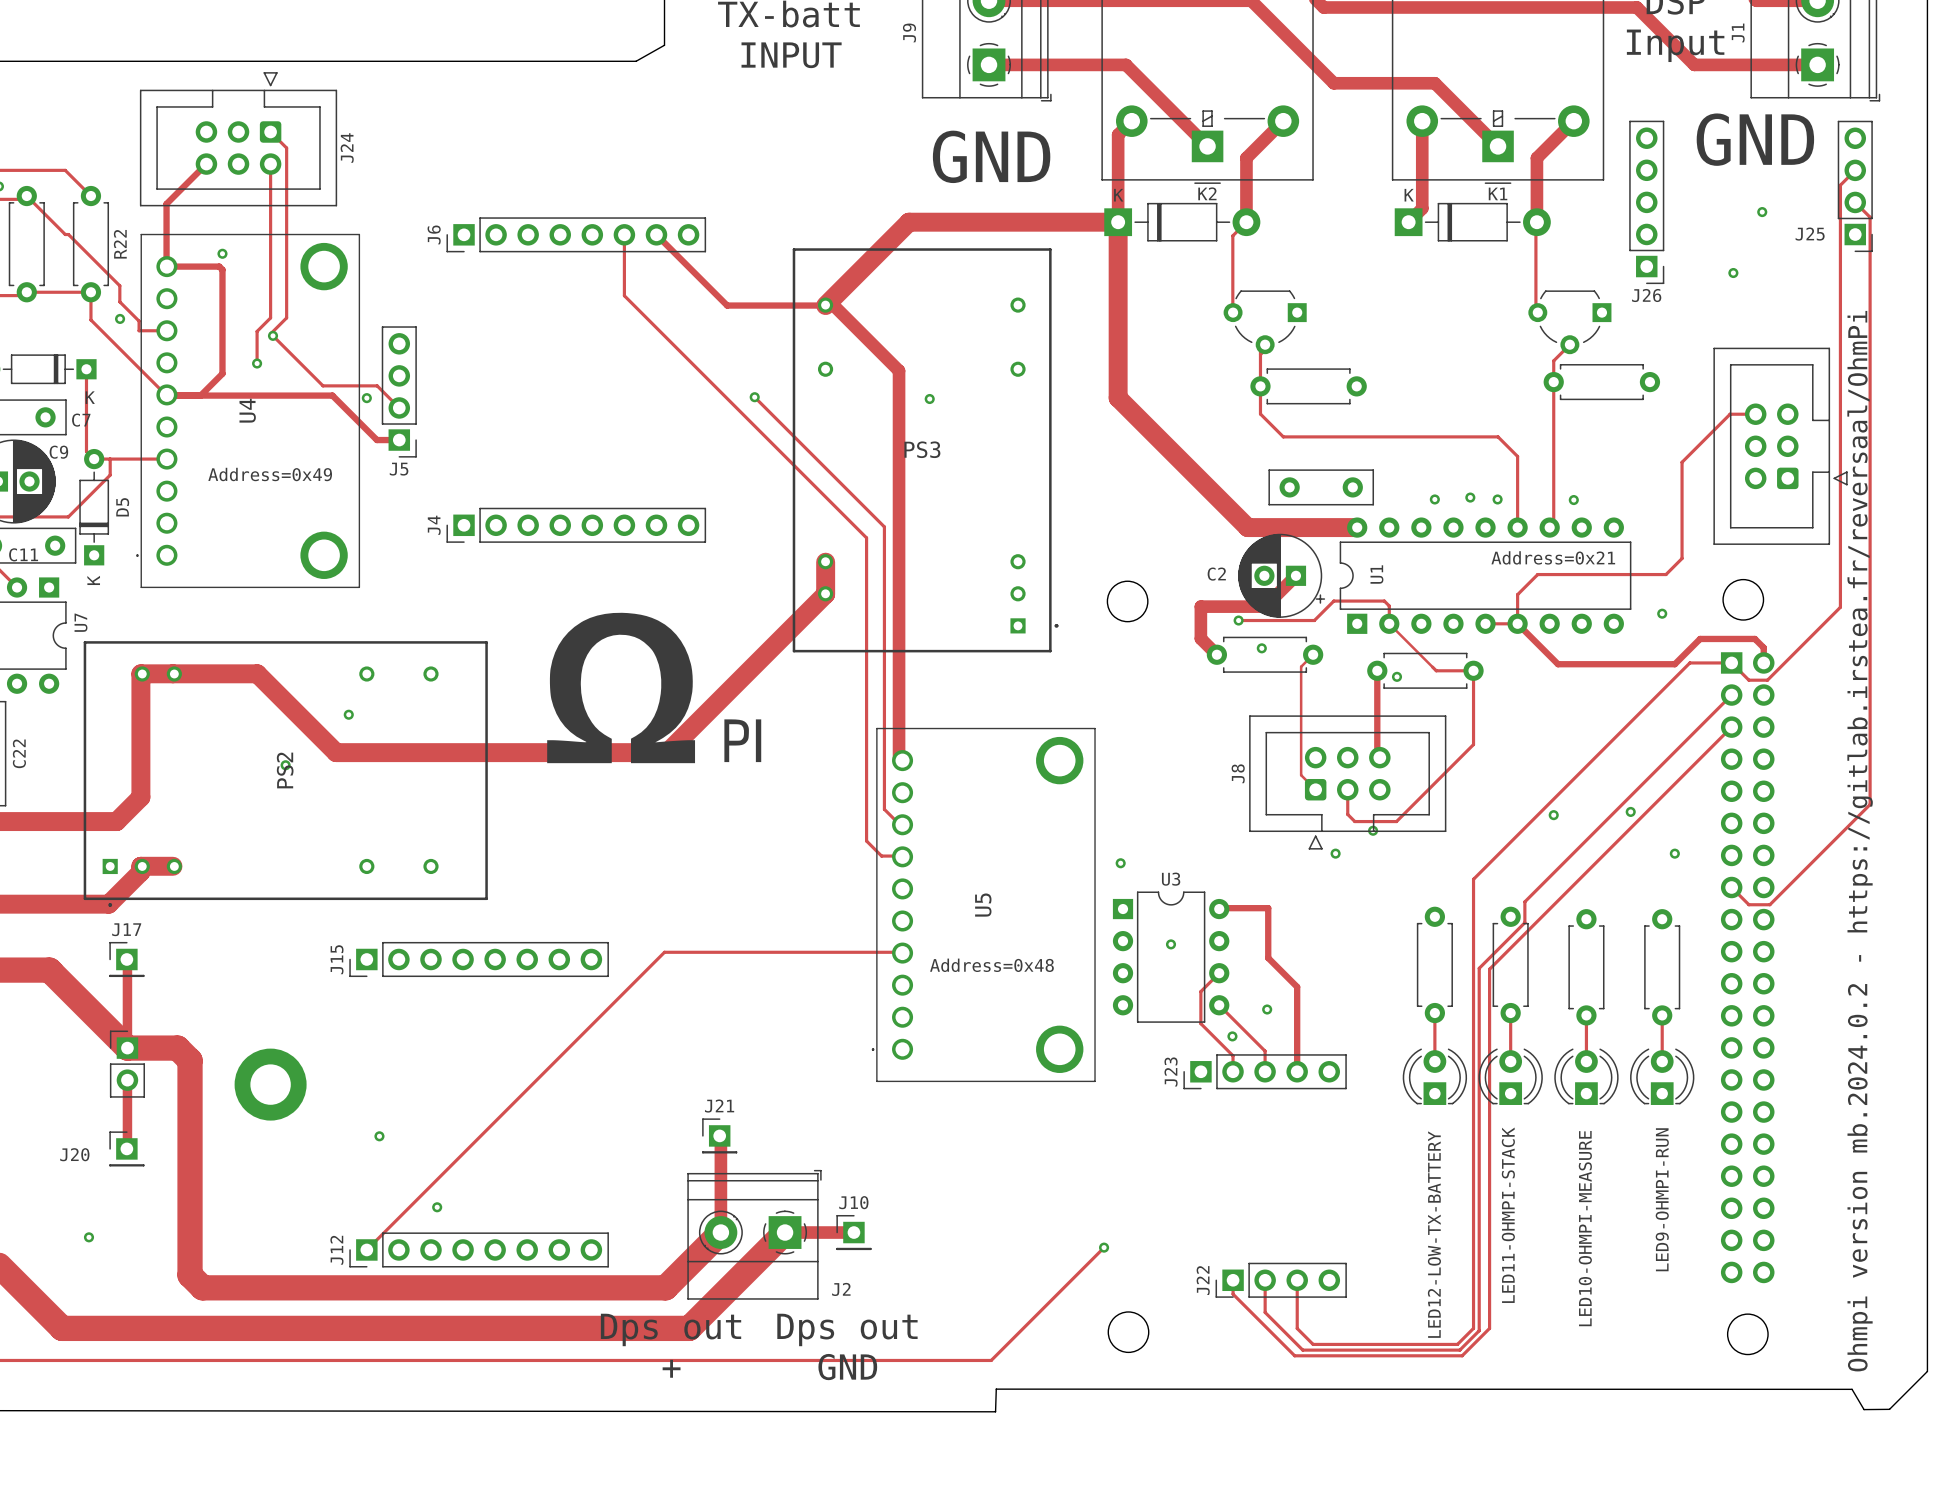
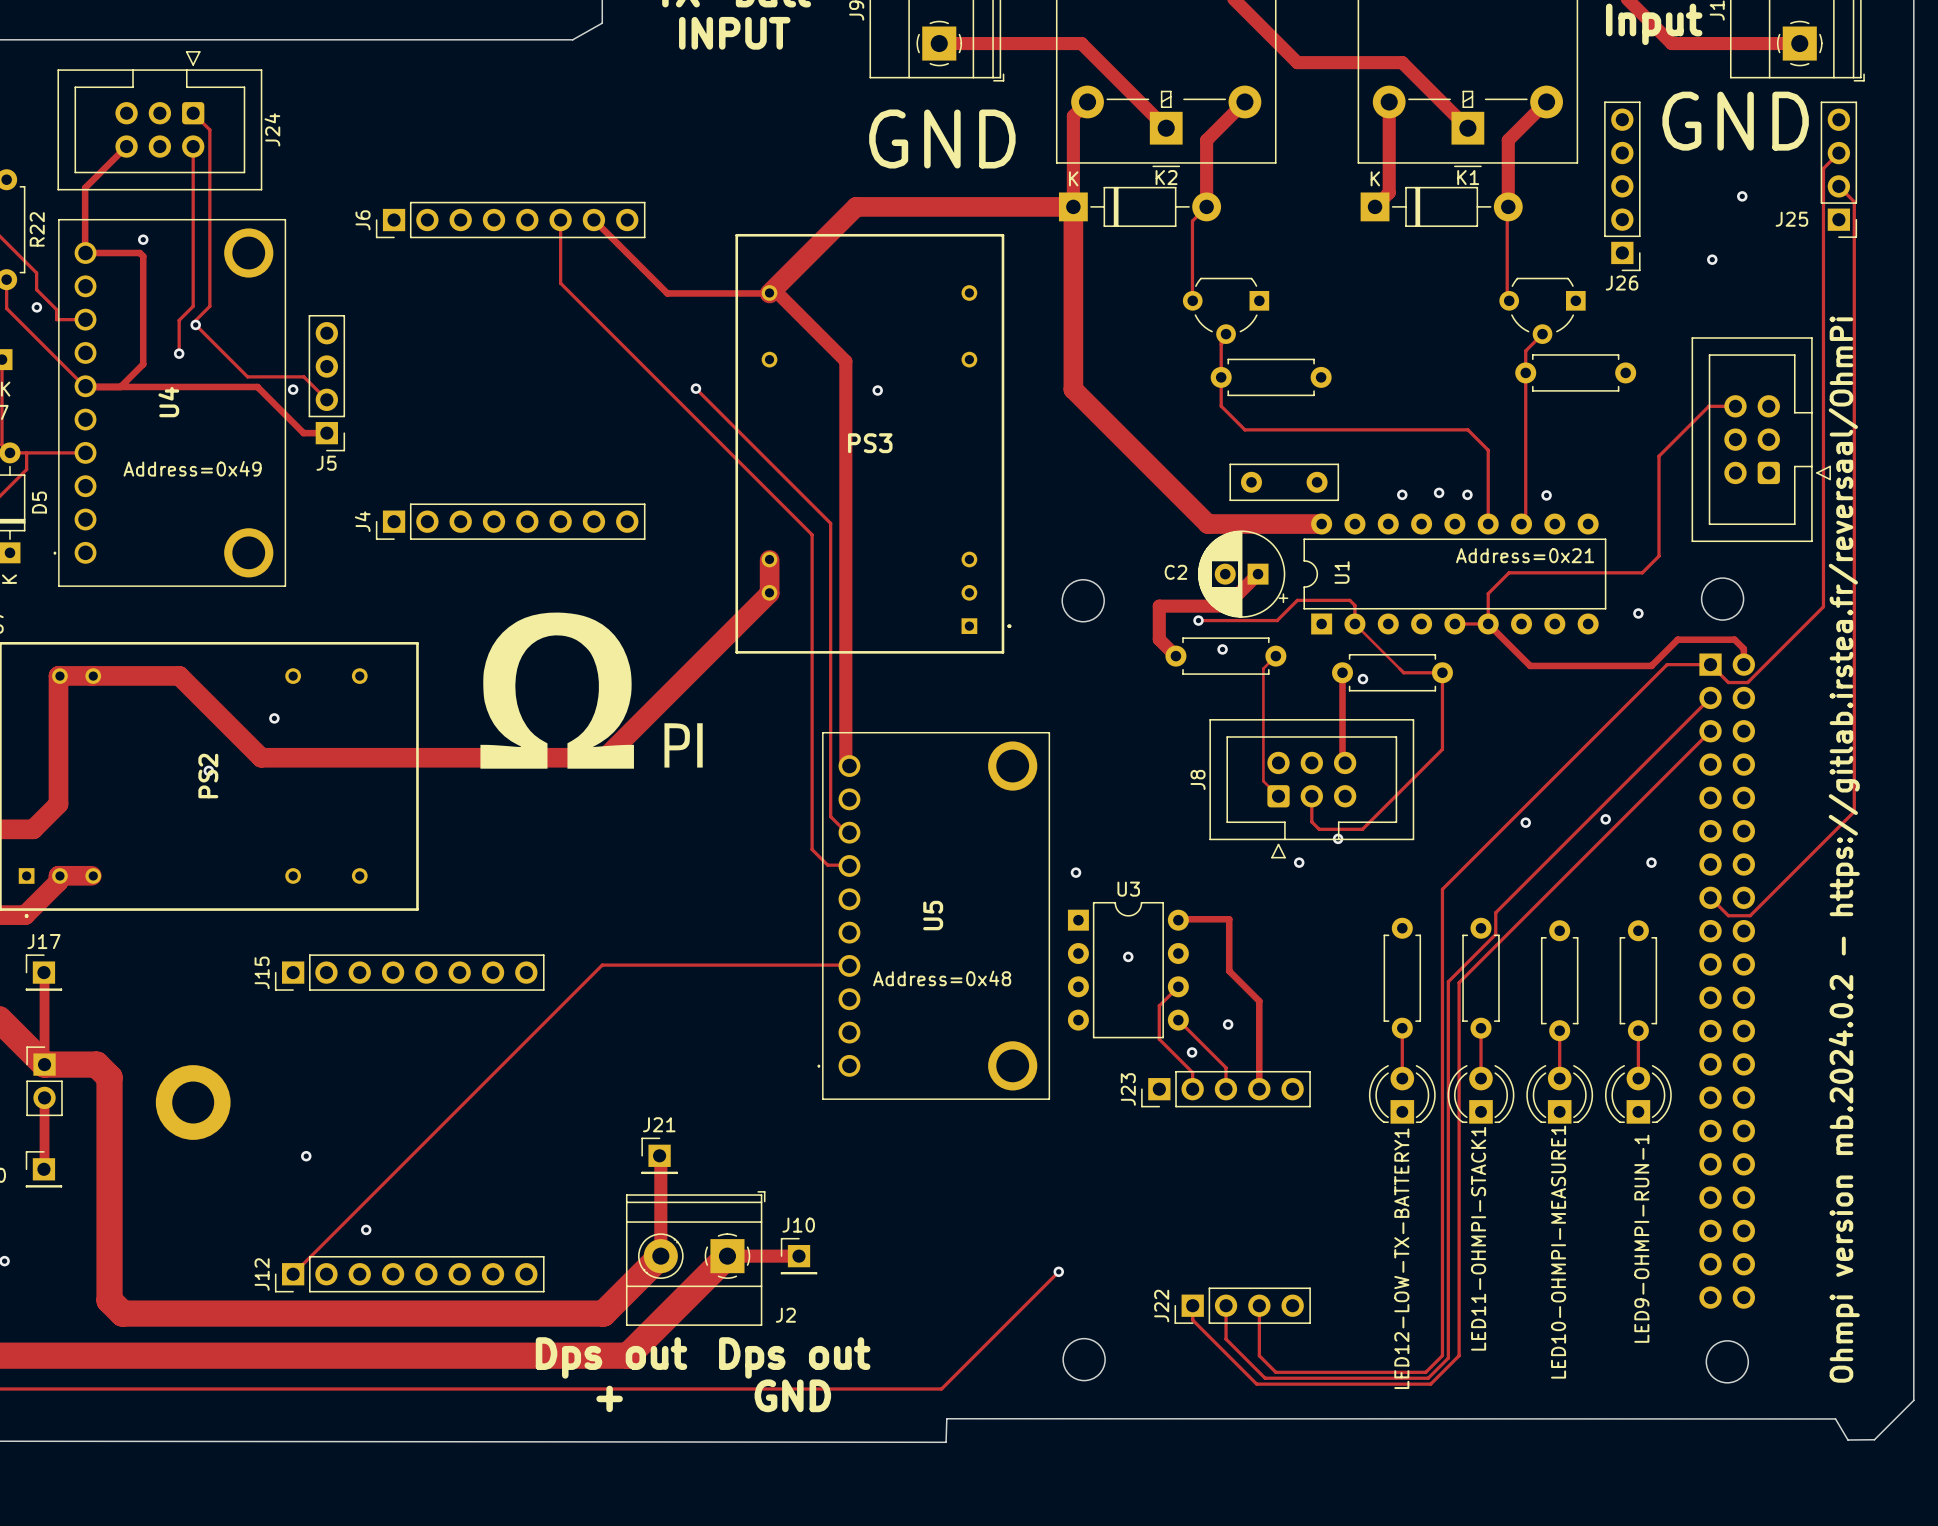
LED9-OHMPI-RUN name: LED9-OHMPI-RUN (1662, 1199) -> LED9-OHMPI-RUN-1 (1641, 1238)
LED11-OHMPI-STACK name: LED11-OHMPI-STACK (1508, 1215) -> LED11-OHMPI-STACK1 (1478, 1238)
LED10-OHMPI-MEASURE name: LED10-OHMPI-MEASURE (1585, 1228) -> LED10-OHMPI-MEASURE1 (1558, 1252)
LED12-LOW-TX-BATTERY name: LED12-LOW-TX-BATTERY (1434, 1234) -> LED12-LOW-TX-BATTERY1 (1401, 1258)

